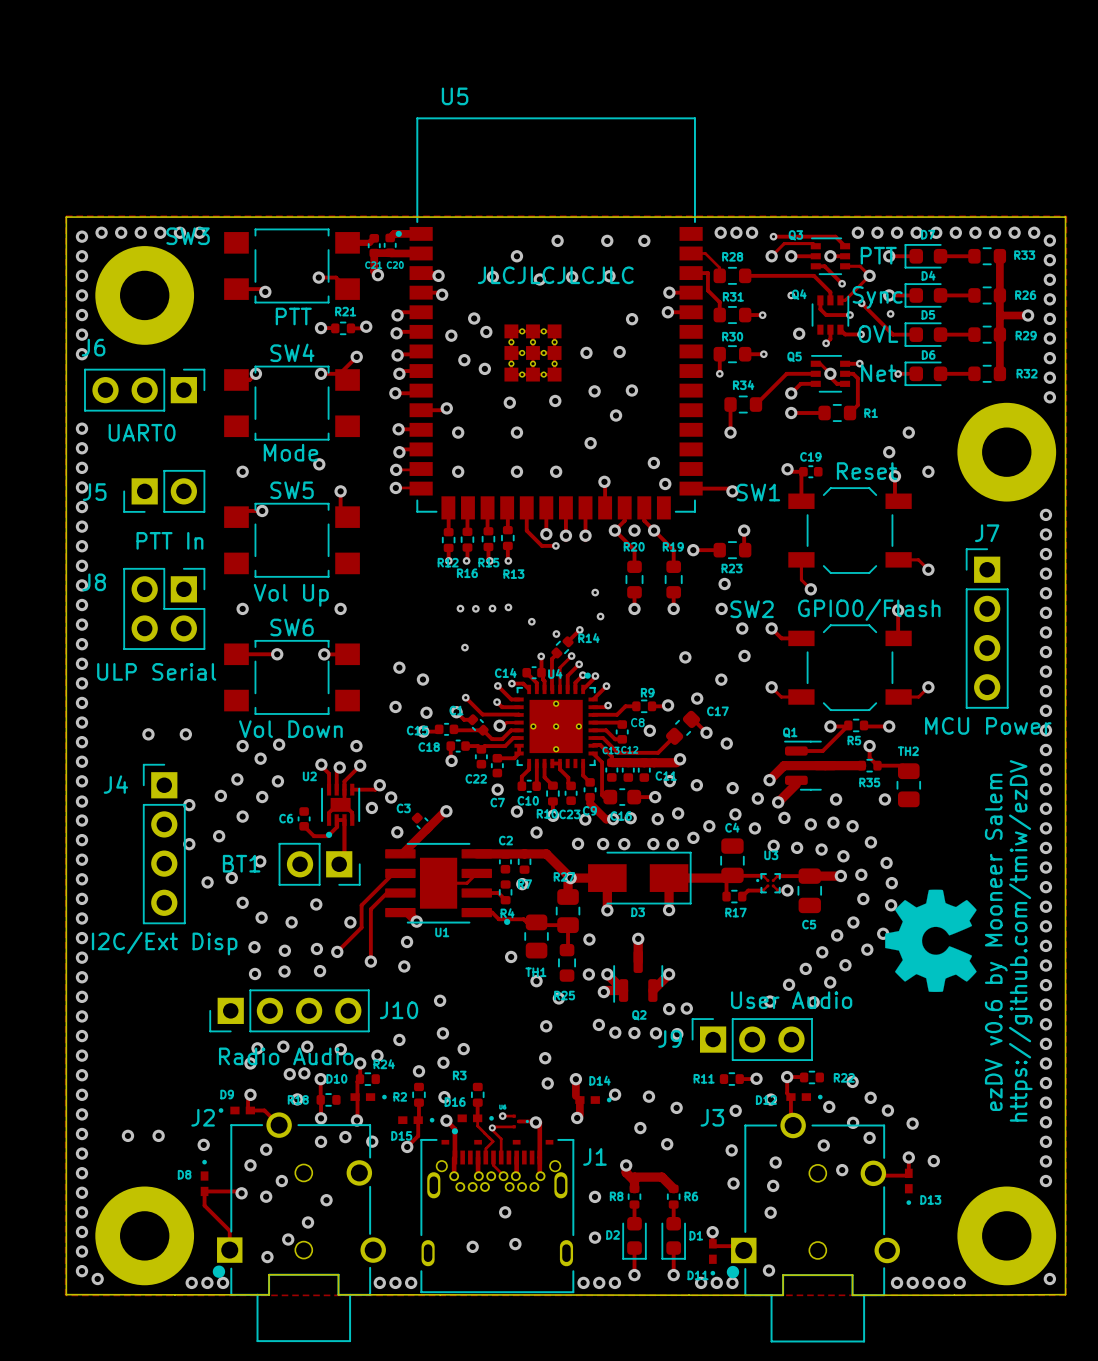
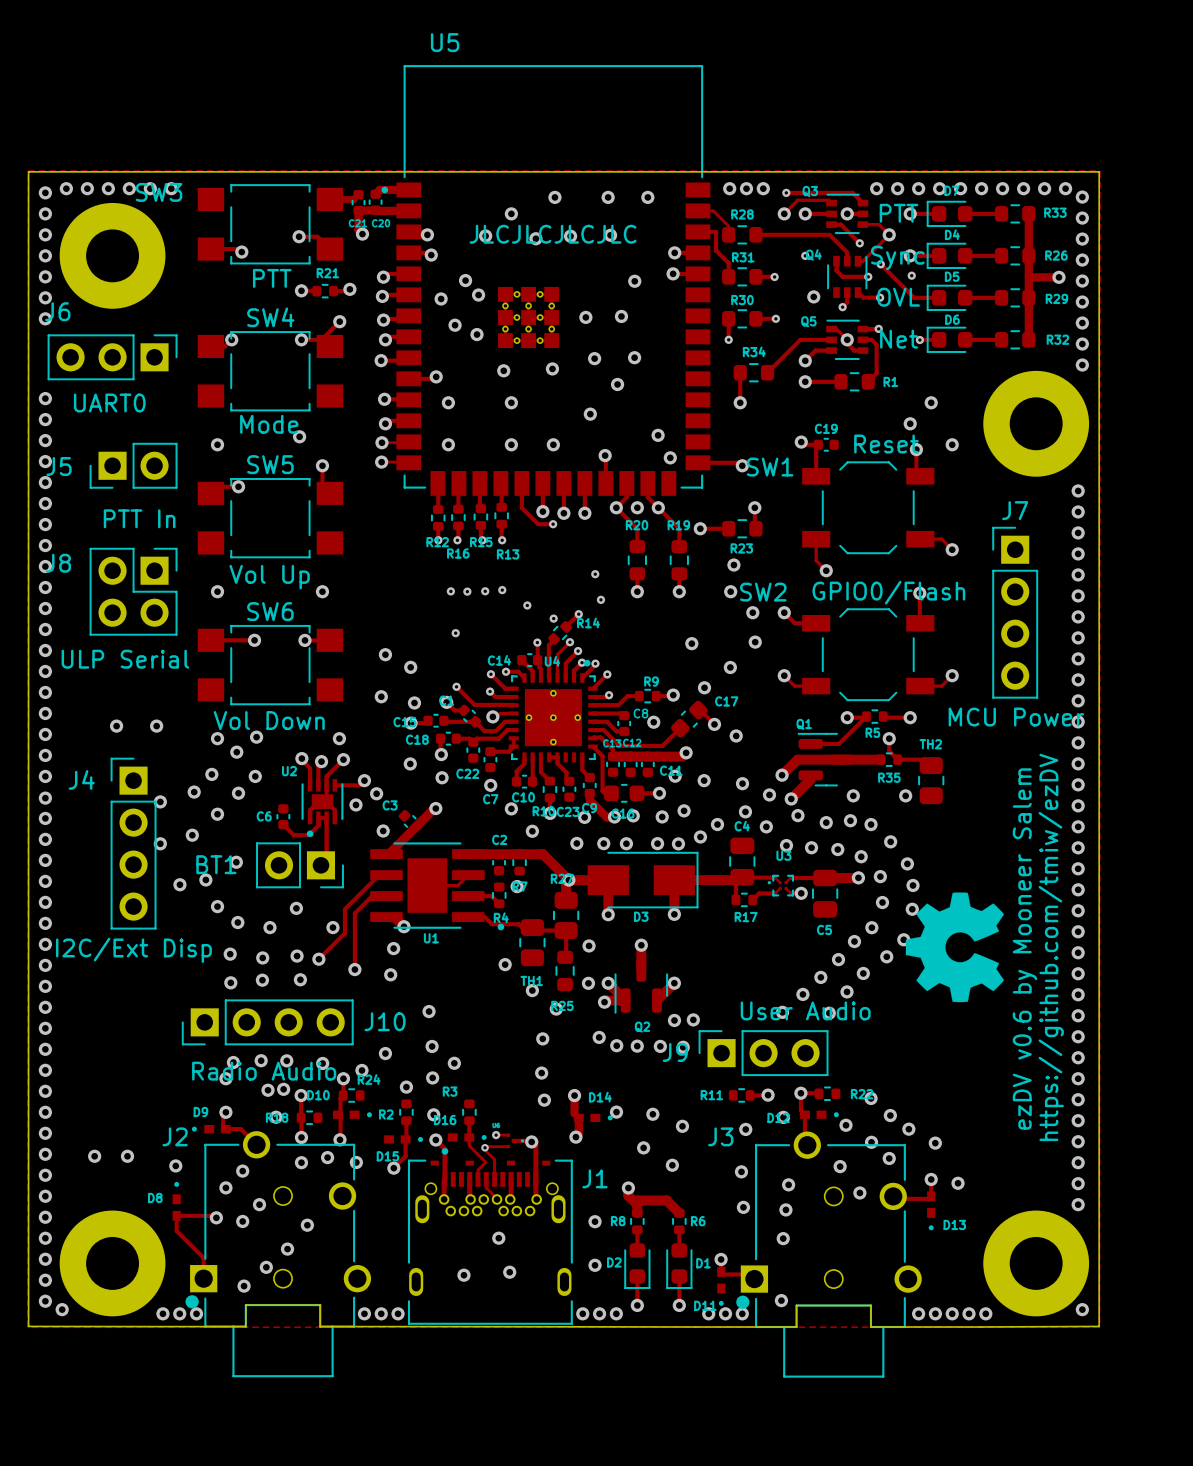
via: none -> (410, 763)
via: none -> (442, 777)

